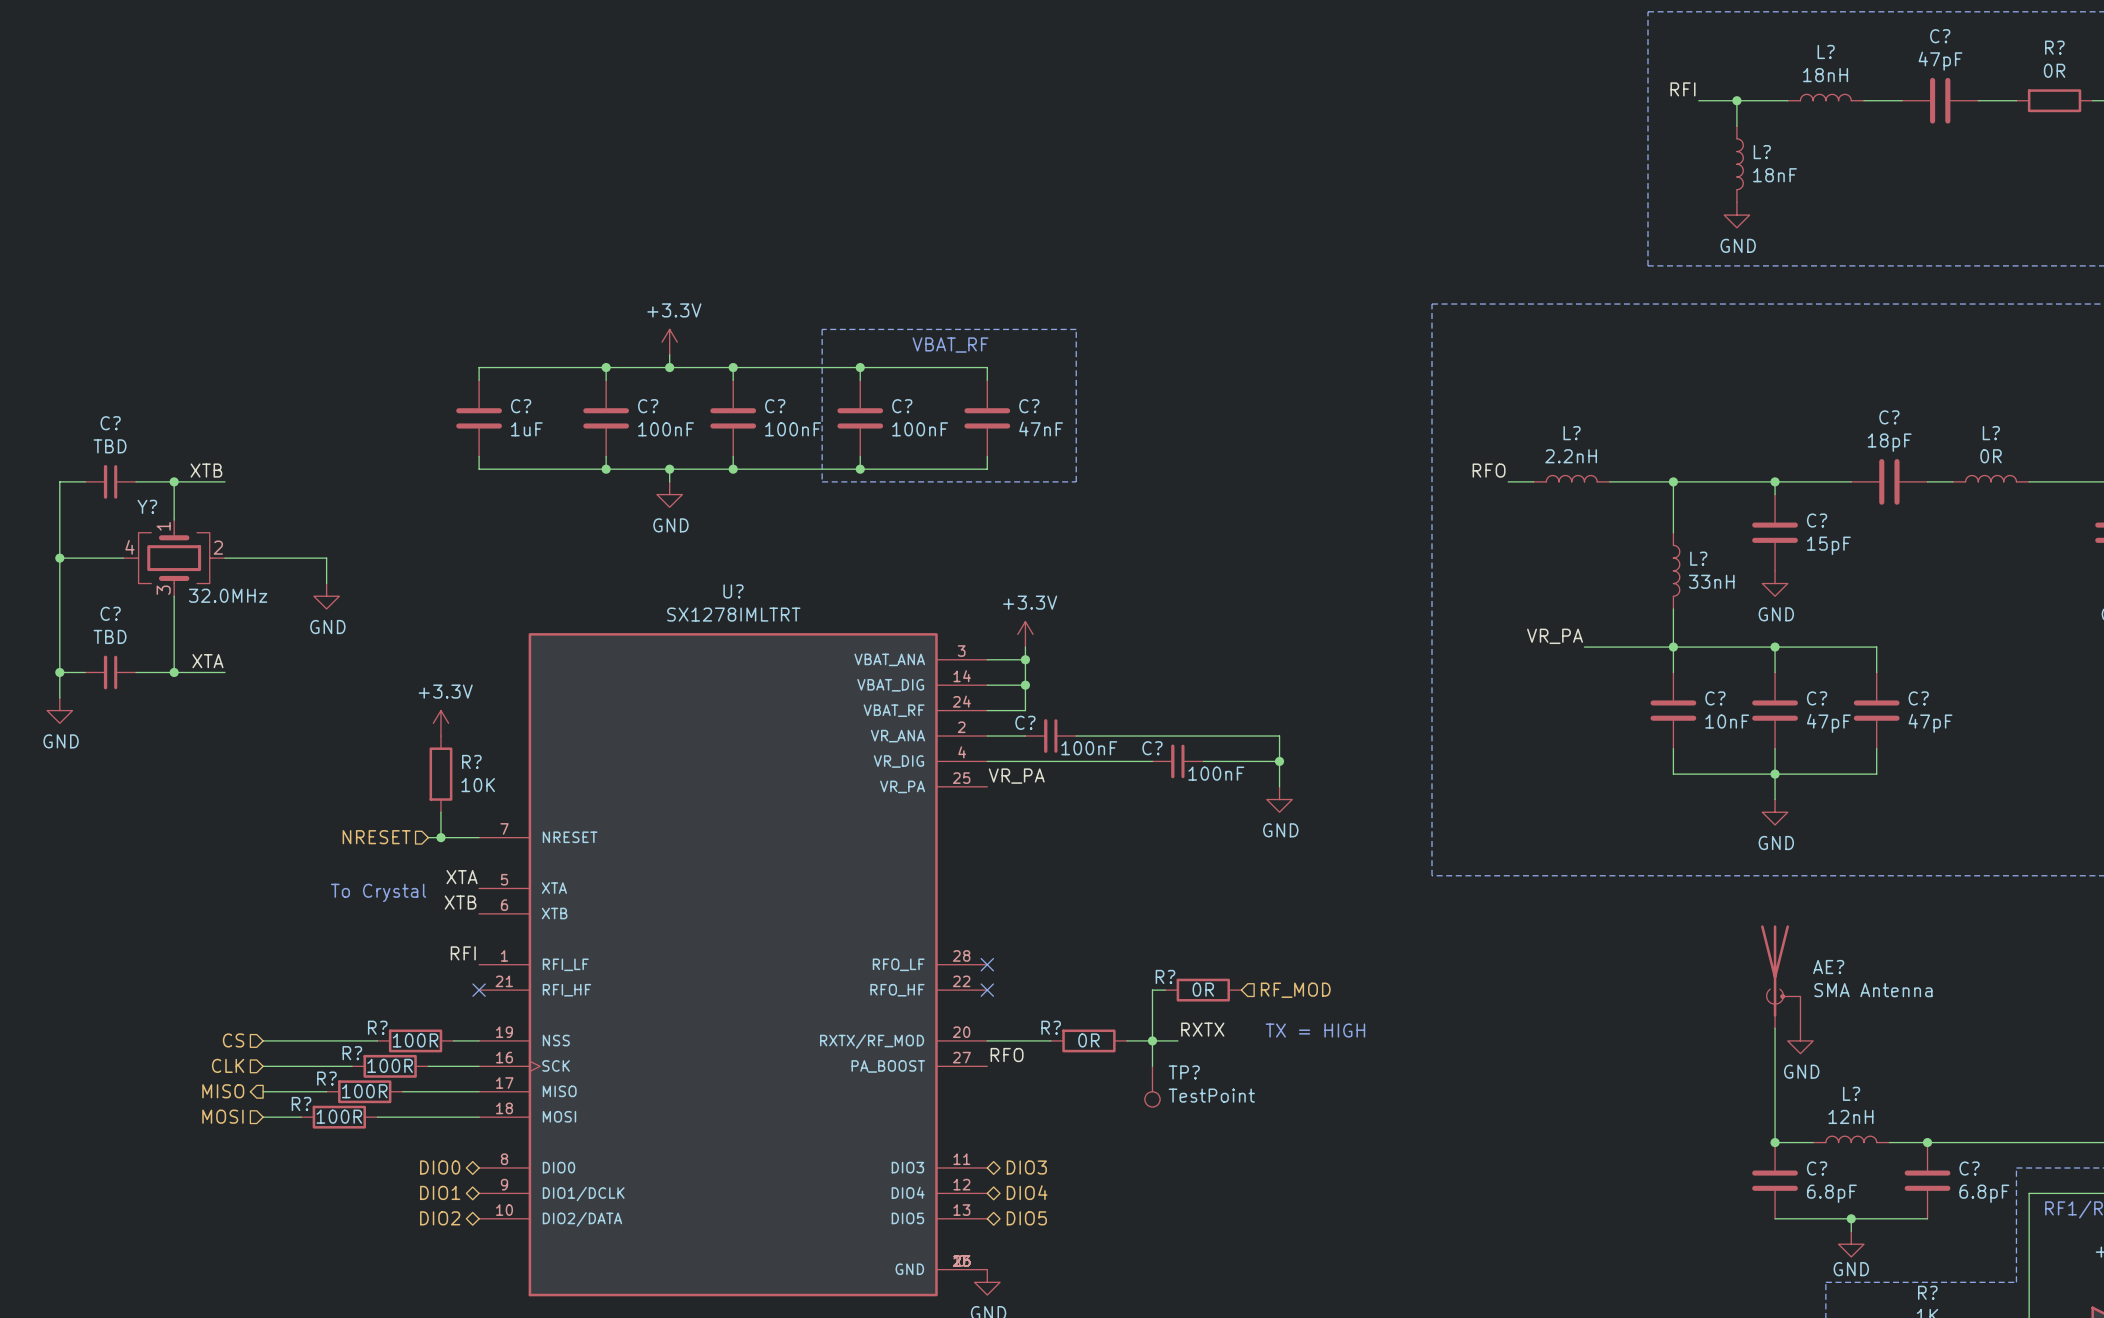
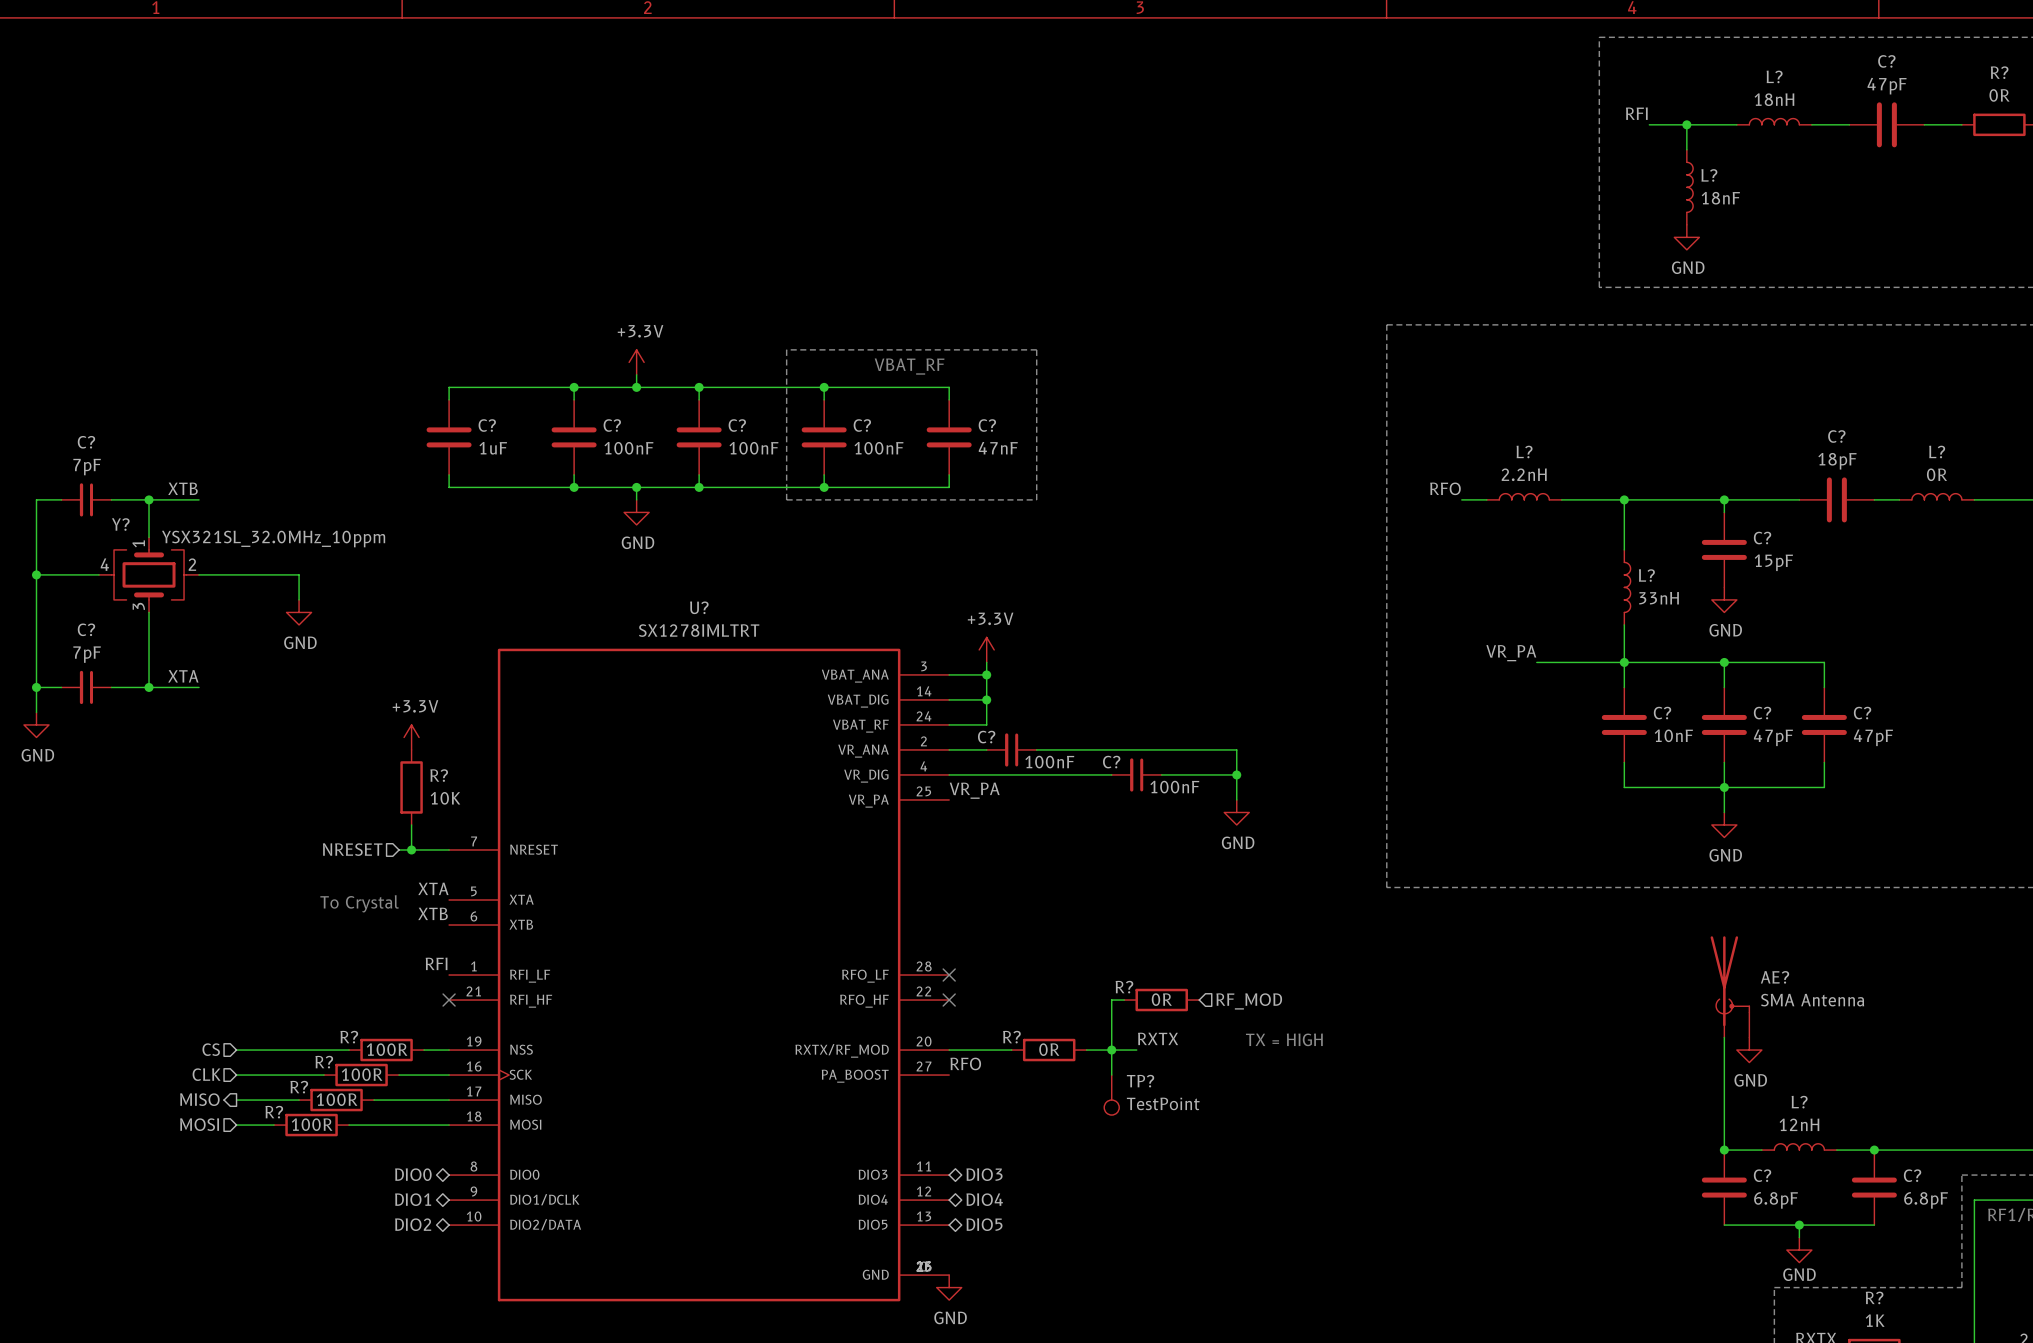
C? value: TBD (110, 446) -> 7pF (87, 467)
Y? value: 32.0MHz (228, 595) -> YSX321SL_32.0MHz_10ppm (273, 539)
C? value: TBD (110, 636) -> 7pF (87, 654)

